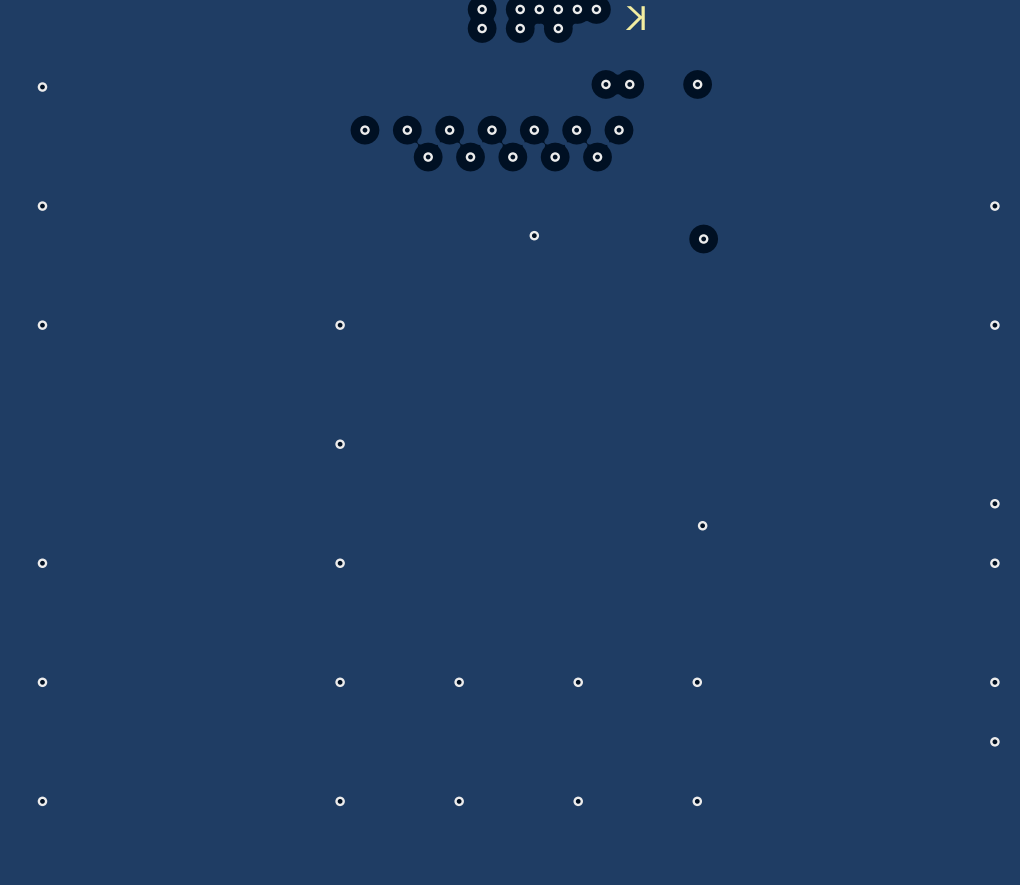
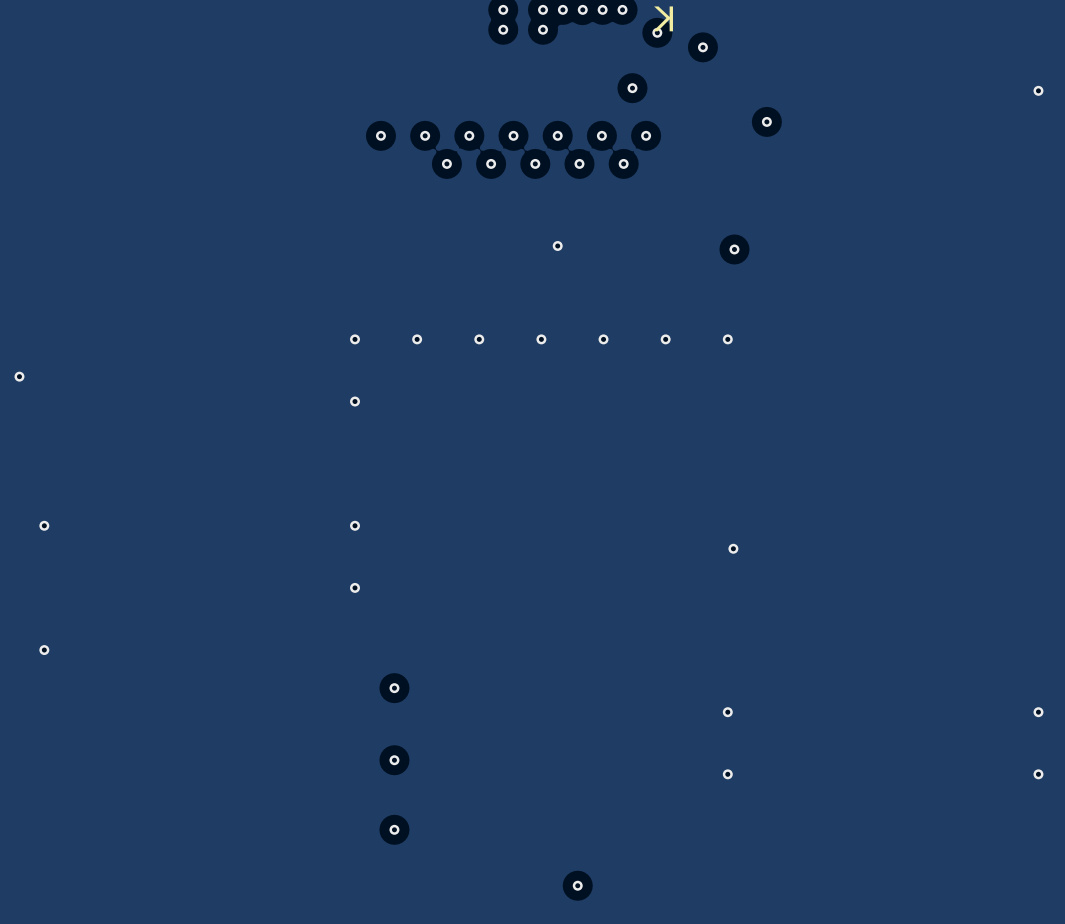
via: (558, 28) -> none
via: none -> (657, 32)
via: none -> (702, 47)
via: (629, 84) -> none
via: (697, 84) -> none
via: (42, 87) -> none
via: none -> (1038, 90)
via: none -> (766, 121)
via: (42, 206) -> none
via: (994, 206) -> none
via: (42, 325) -> none
via: none -> (417, 339)
via: none -> (479, 339)
via: none -> (541, 339)
via: none -> (603, 339)
via: none -> (665, 339)
via: none -> (727, 339)
via: (994, 325) -> none
via: none -> (19, 376)
via: none -> (355, 401)
via: (340, 444) -> none
via: none -> (44, 525)
via: none -> (355, 525)
via: (994, 503) -> none
via: (42, 563) -> none
via: (994, 563) -> none
via: none -> (44, 650)
via: none -> (394, 688)
via: (42, 682) -> none
via: (340, 682) -> none
via: (459, 682) -> none
via: (578, 682) -> none
via: none -> (394, 760)
via: (42, 801) -> none
via position: (340, 801) -> (394, 829)
via: (459, 801) -> none
via: (578, 801) -> none
via position: (697, 801) -> (727, 774)
via: none -> (577, 885)

